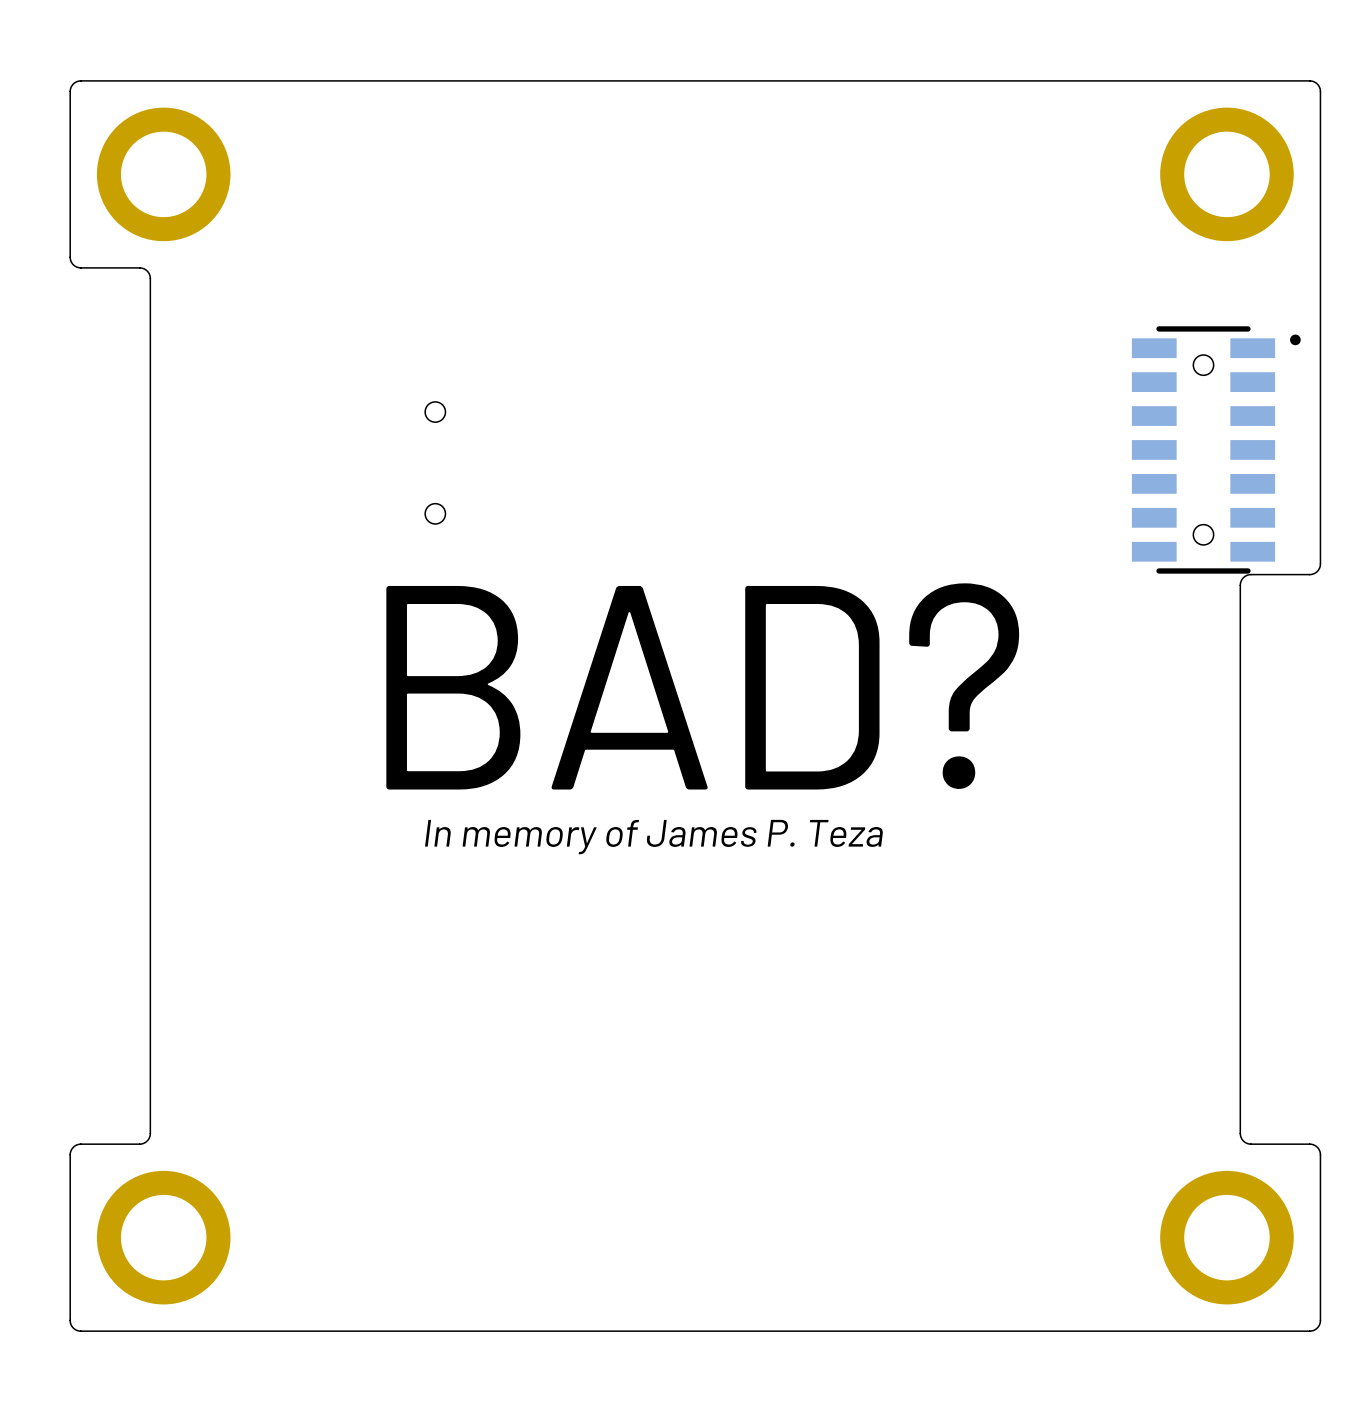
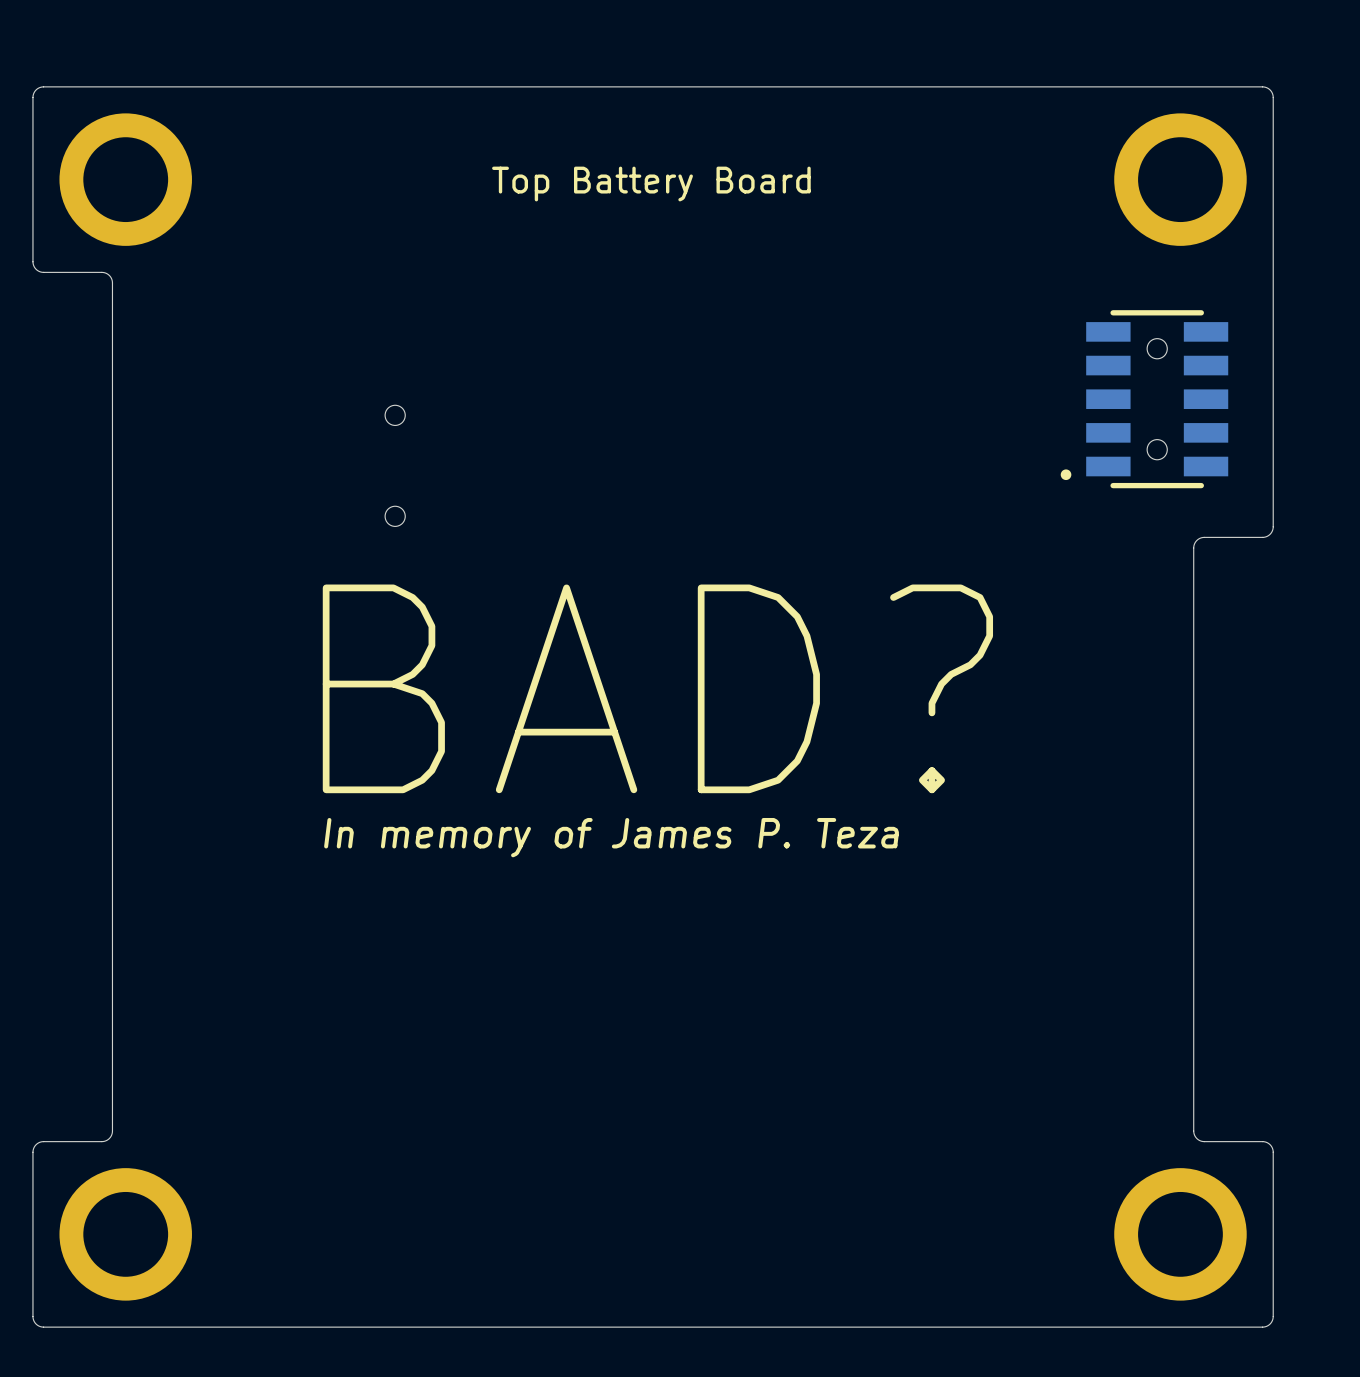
text: none -> Top Battery Board (651, 184)
part: none -> (1144, 399)
part: (1216, 449) -> none
board edge: (1320, 524) (1320, 565) (1316, 572) (1309, 574) (1248, 574) (1242, 578) (1240, 585) -> (1273, 526) (1270, 533) (1264, 537) (1204, 537) (1197, 539) (1193, 546) (1193, 587)

